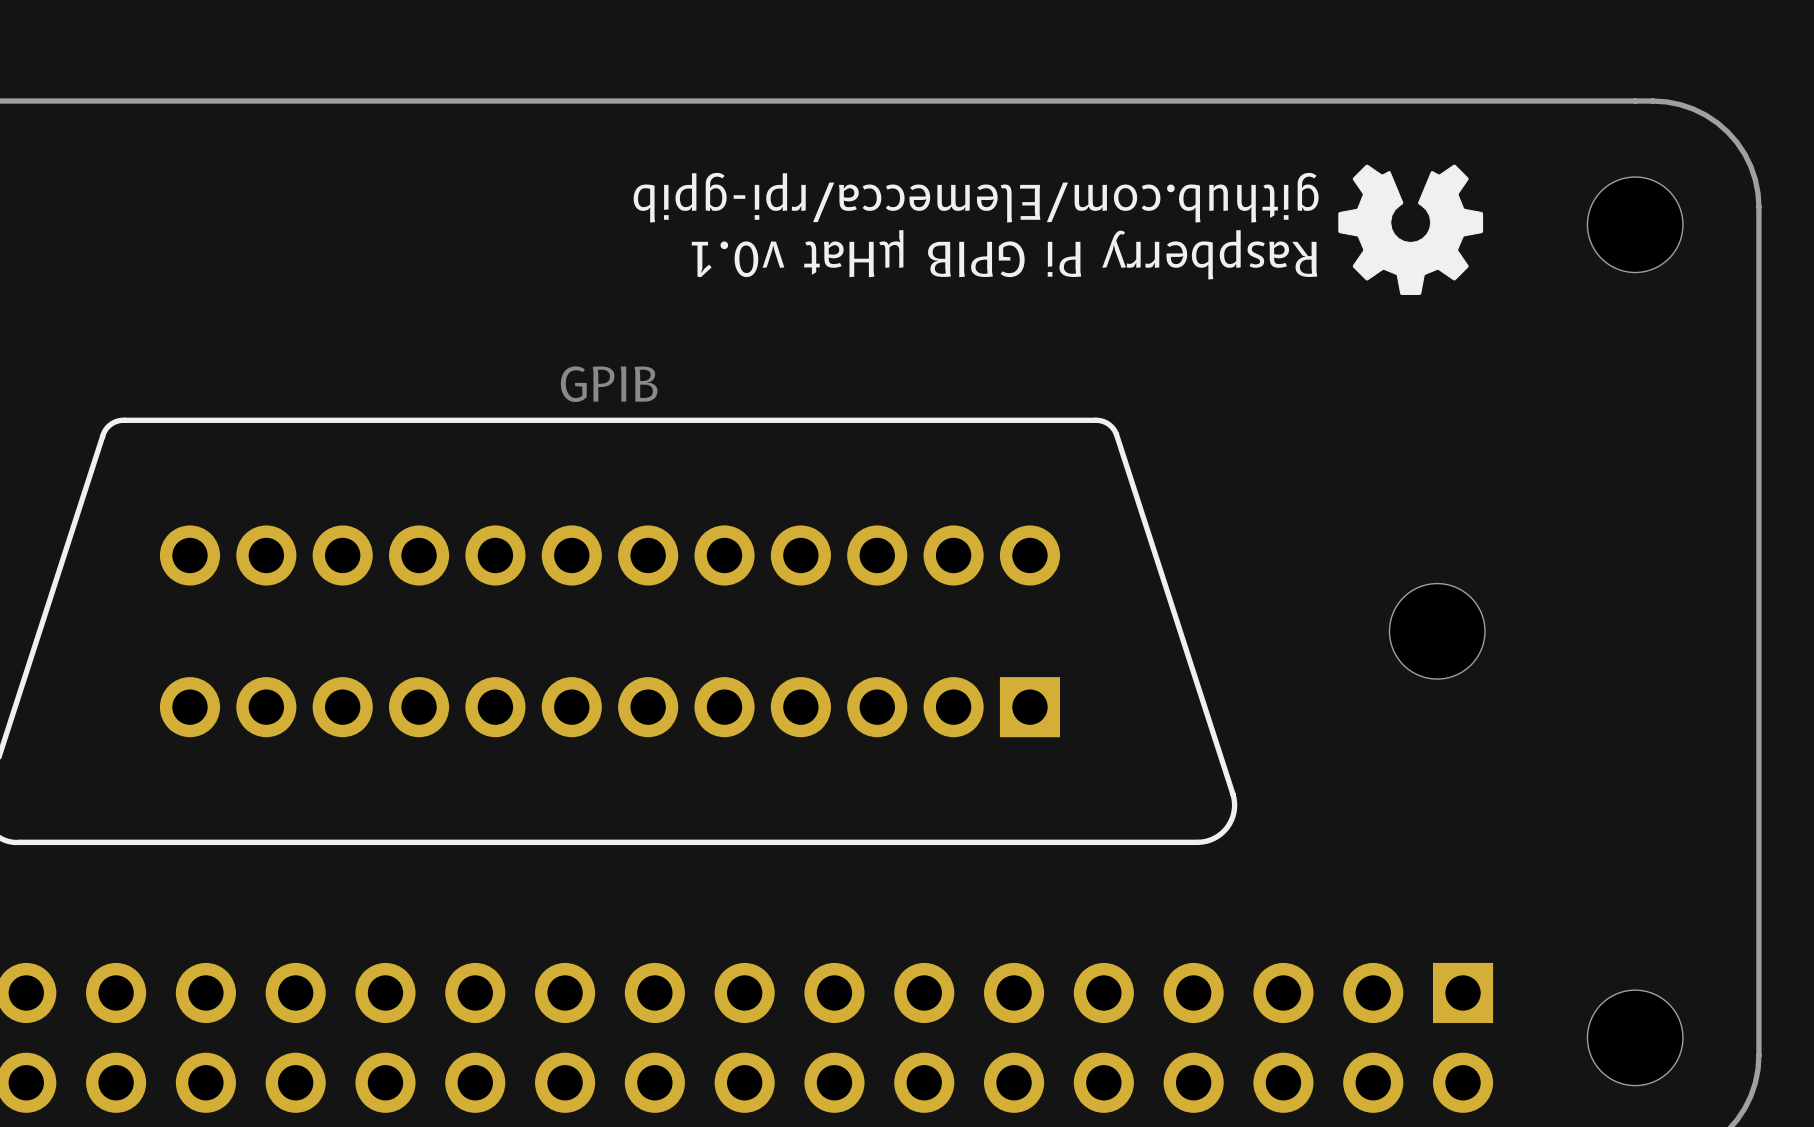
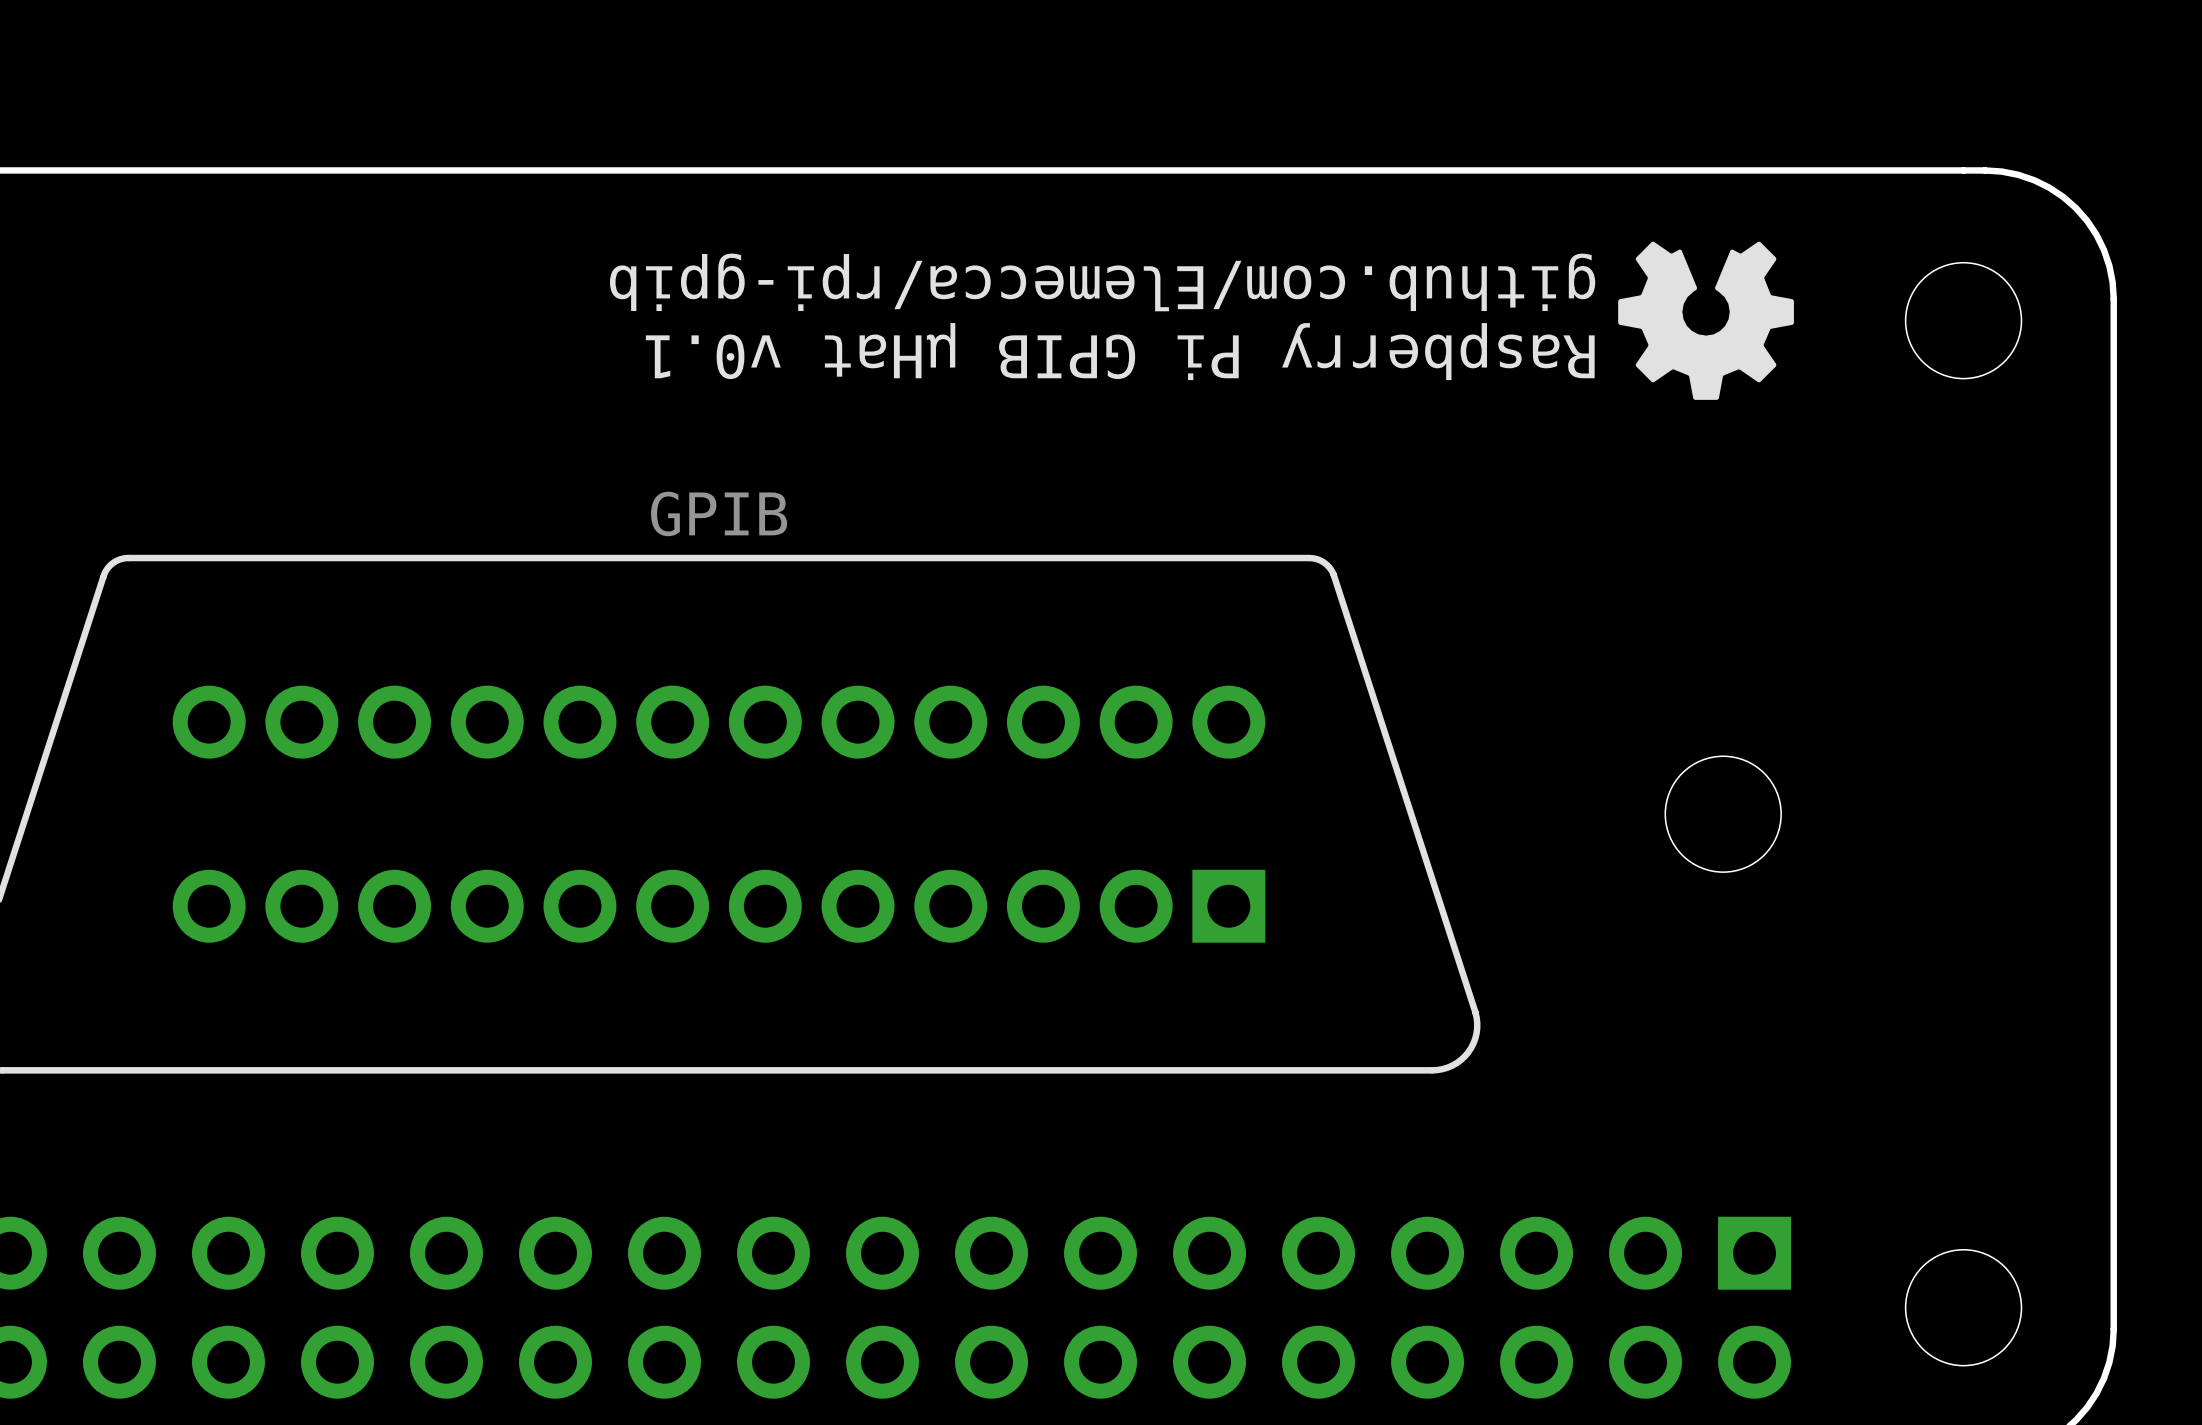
text position: github.com/Elemecca/rpi-gpib (976, 197) -> github.com/Elemecca/rpi-gpib (1102, 282)
drawing position: (1410, 229) -> (1706, 320)
text position: Raspberry Pi GPIB µHat v0.1 (1004, 254) -> Raspberry Pi GPIB µHat v0.1 (1120, 351)

